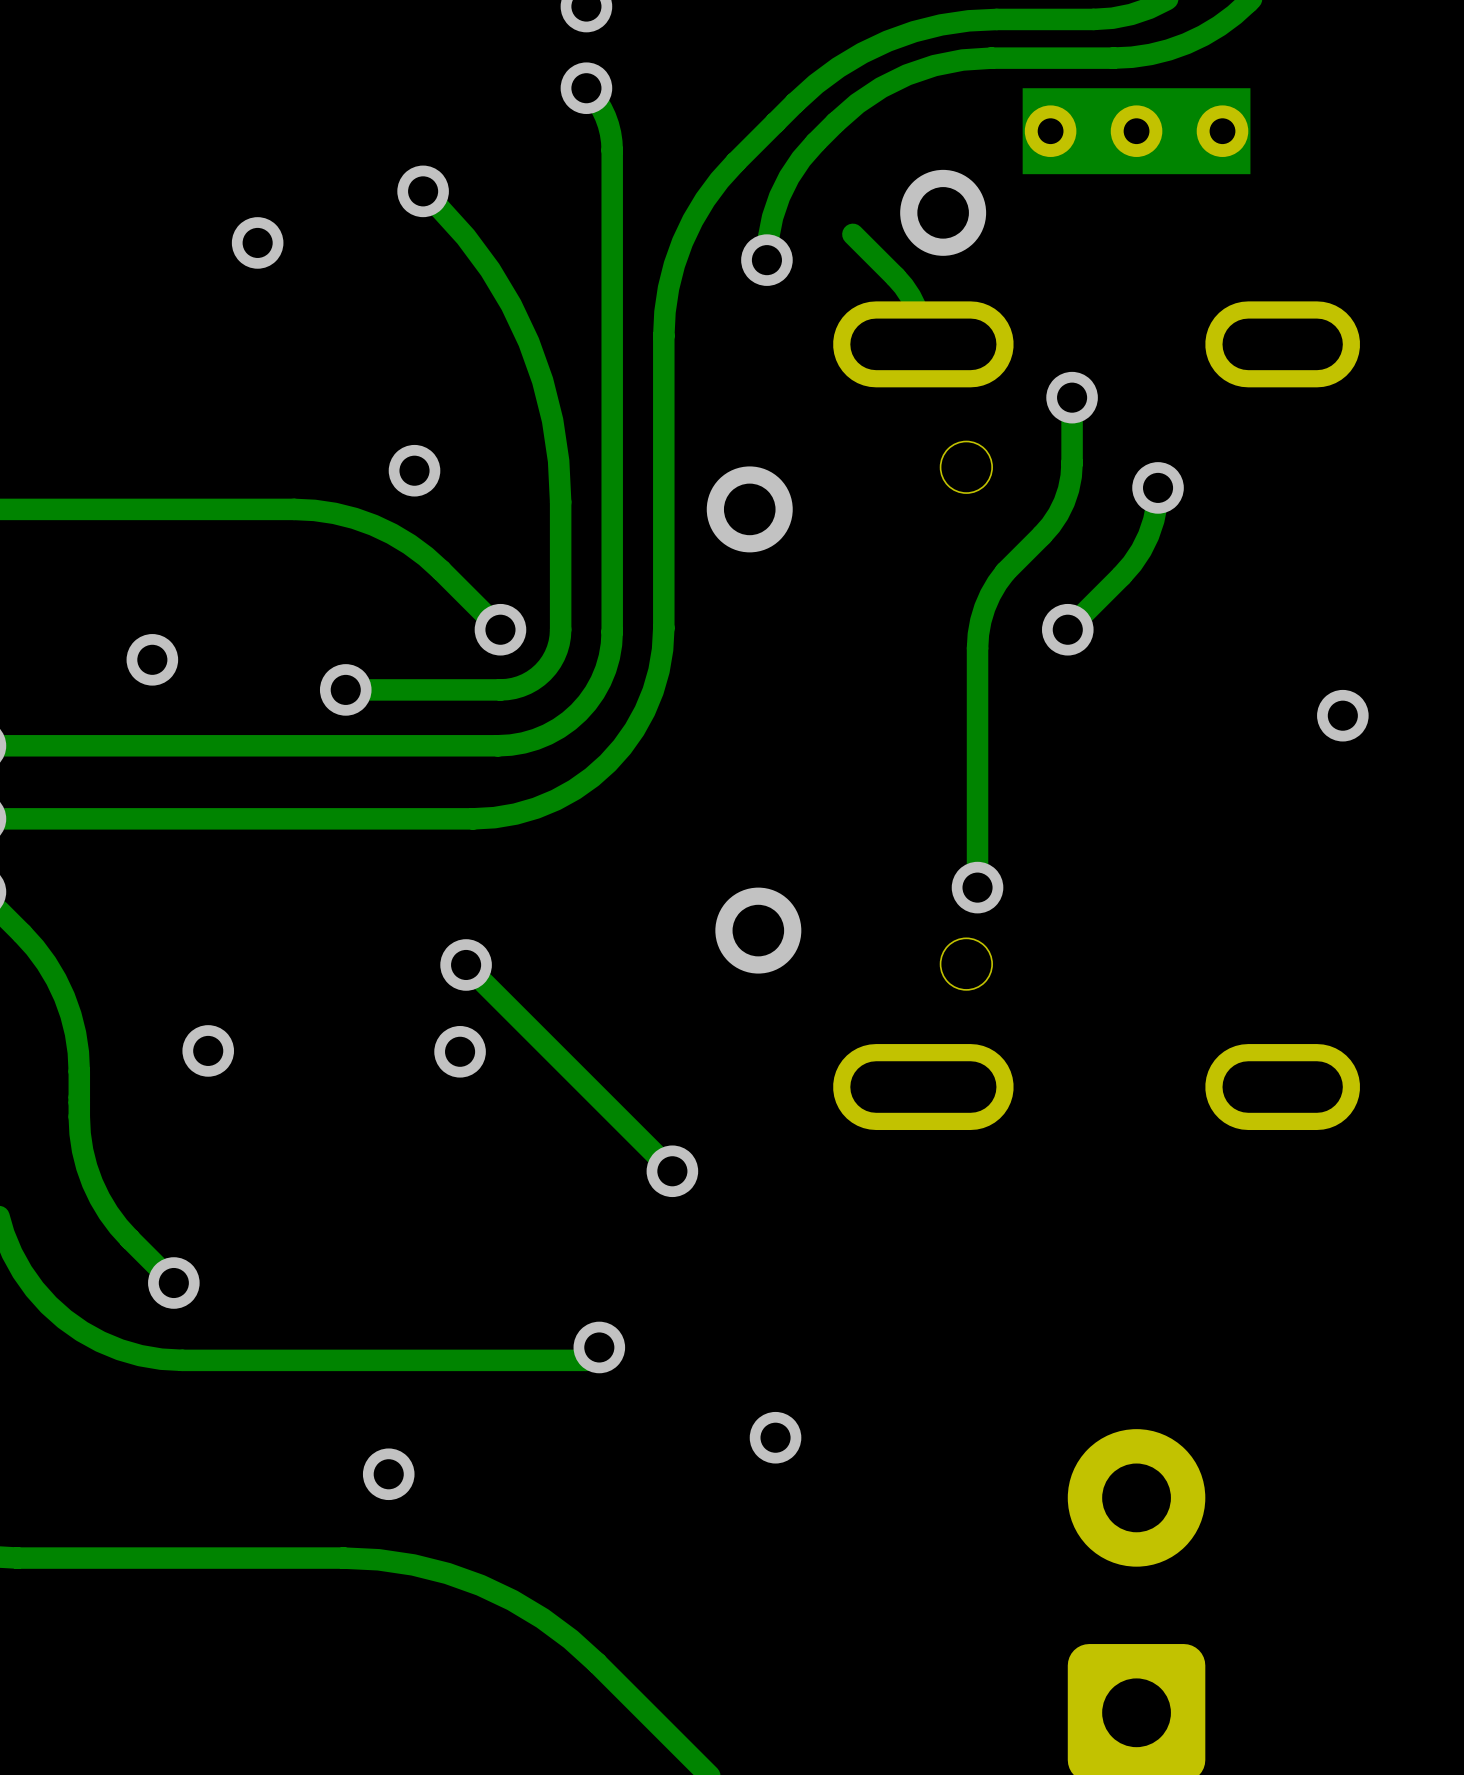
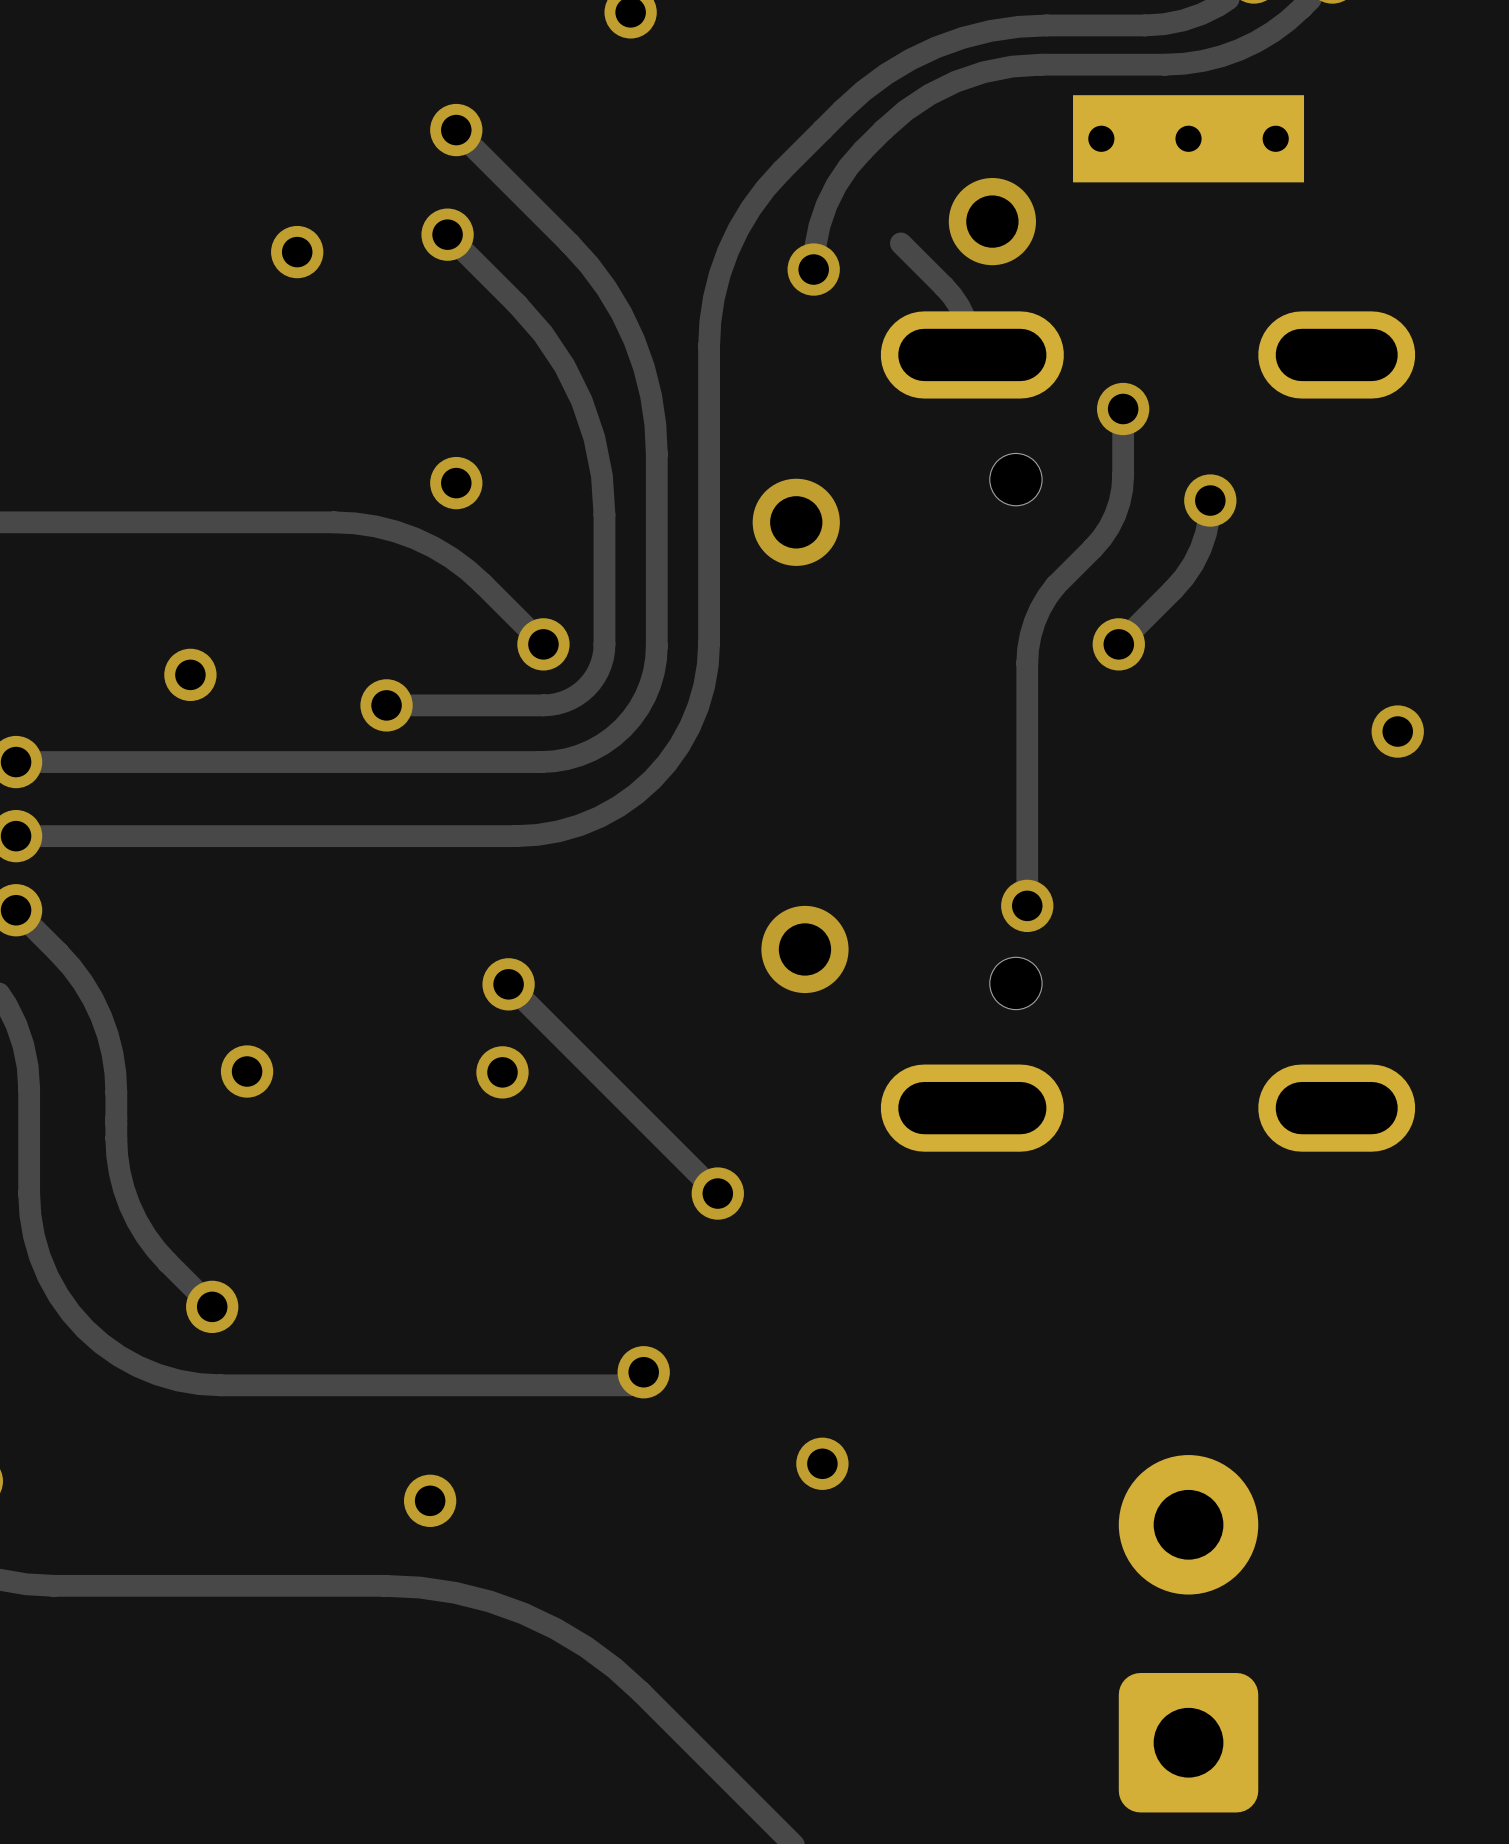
track: (586, 88) (597, 101) (605, 116) (611, 141) (612, 441) -> (456, 130) (569, 243) (606, 288) (634, 339) (643, 367) (651, 395) (656, 453)
via: (586, 88) -> none
via: none -> (456, 130)
track: (423, 191) (465, 236) (490, 269) (511, 304) (528, 342) (542, 380) (552, 420) (558, 461) (560, 502) -> (447, 234) (517, 304) (542, 333) (564, 366) (581, 400) (594, 437) (601, 476) (604, 514)
via position: (423, 191) -> (447, 234)

